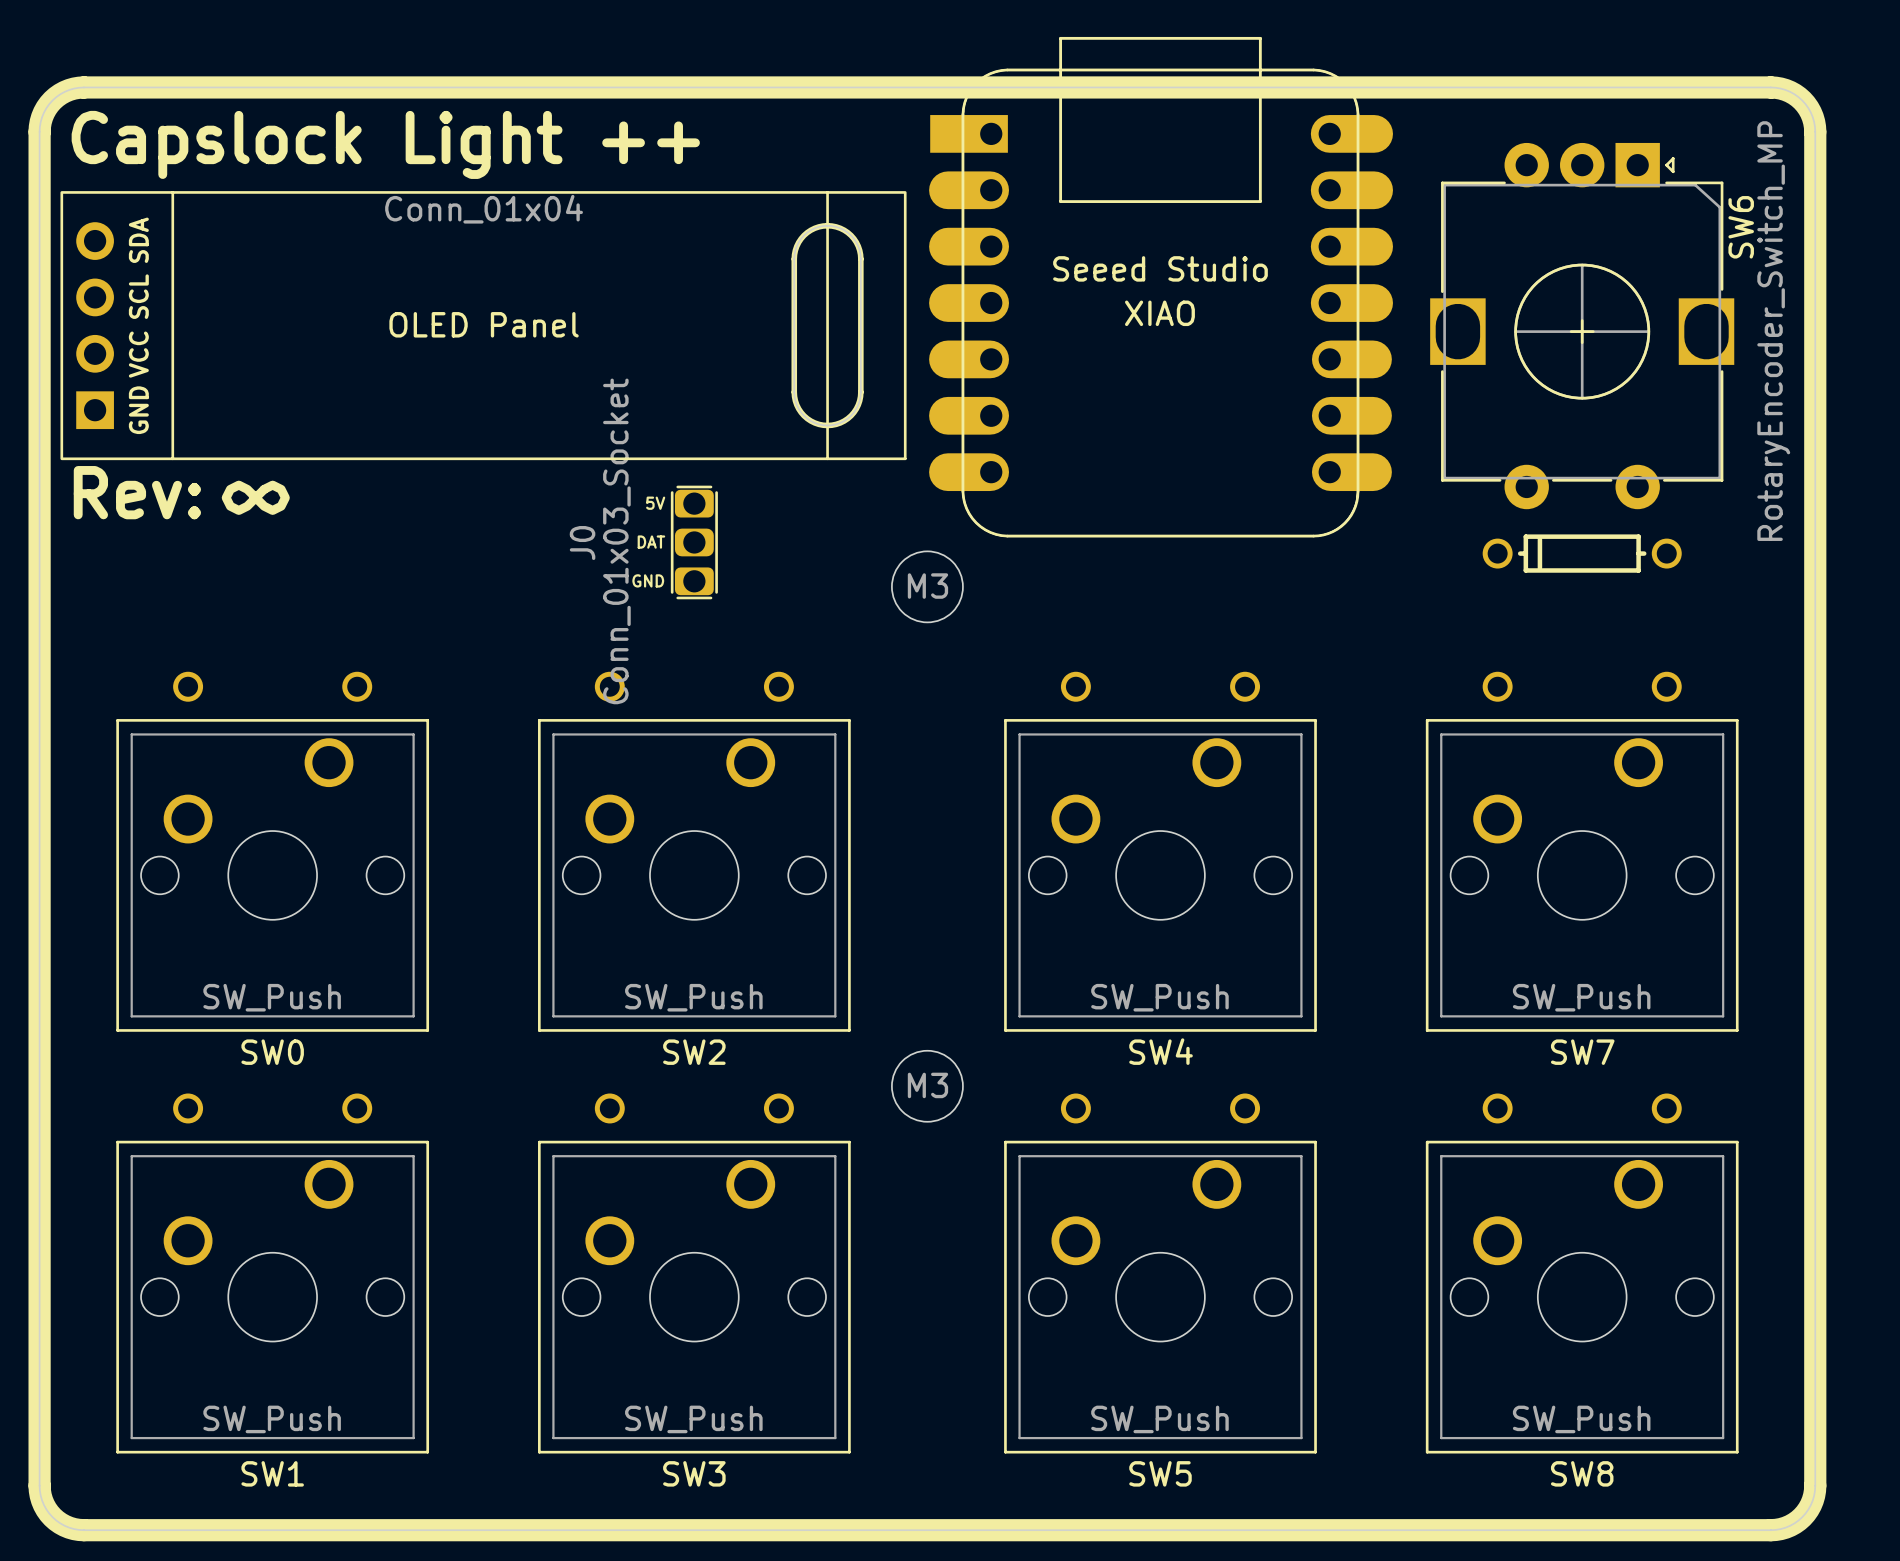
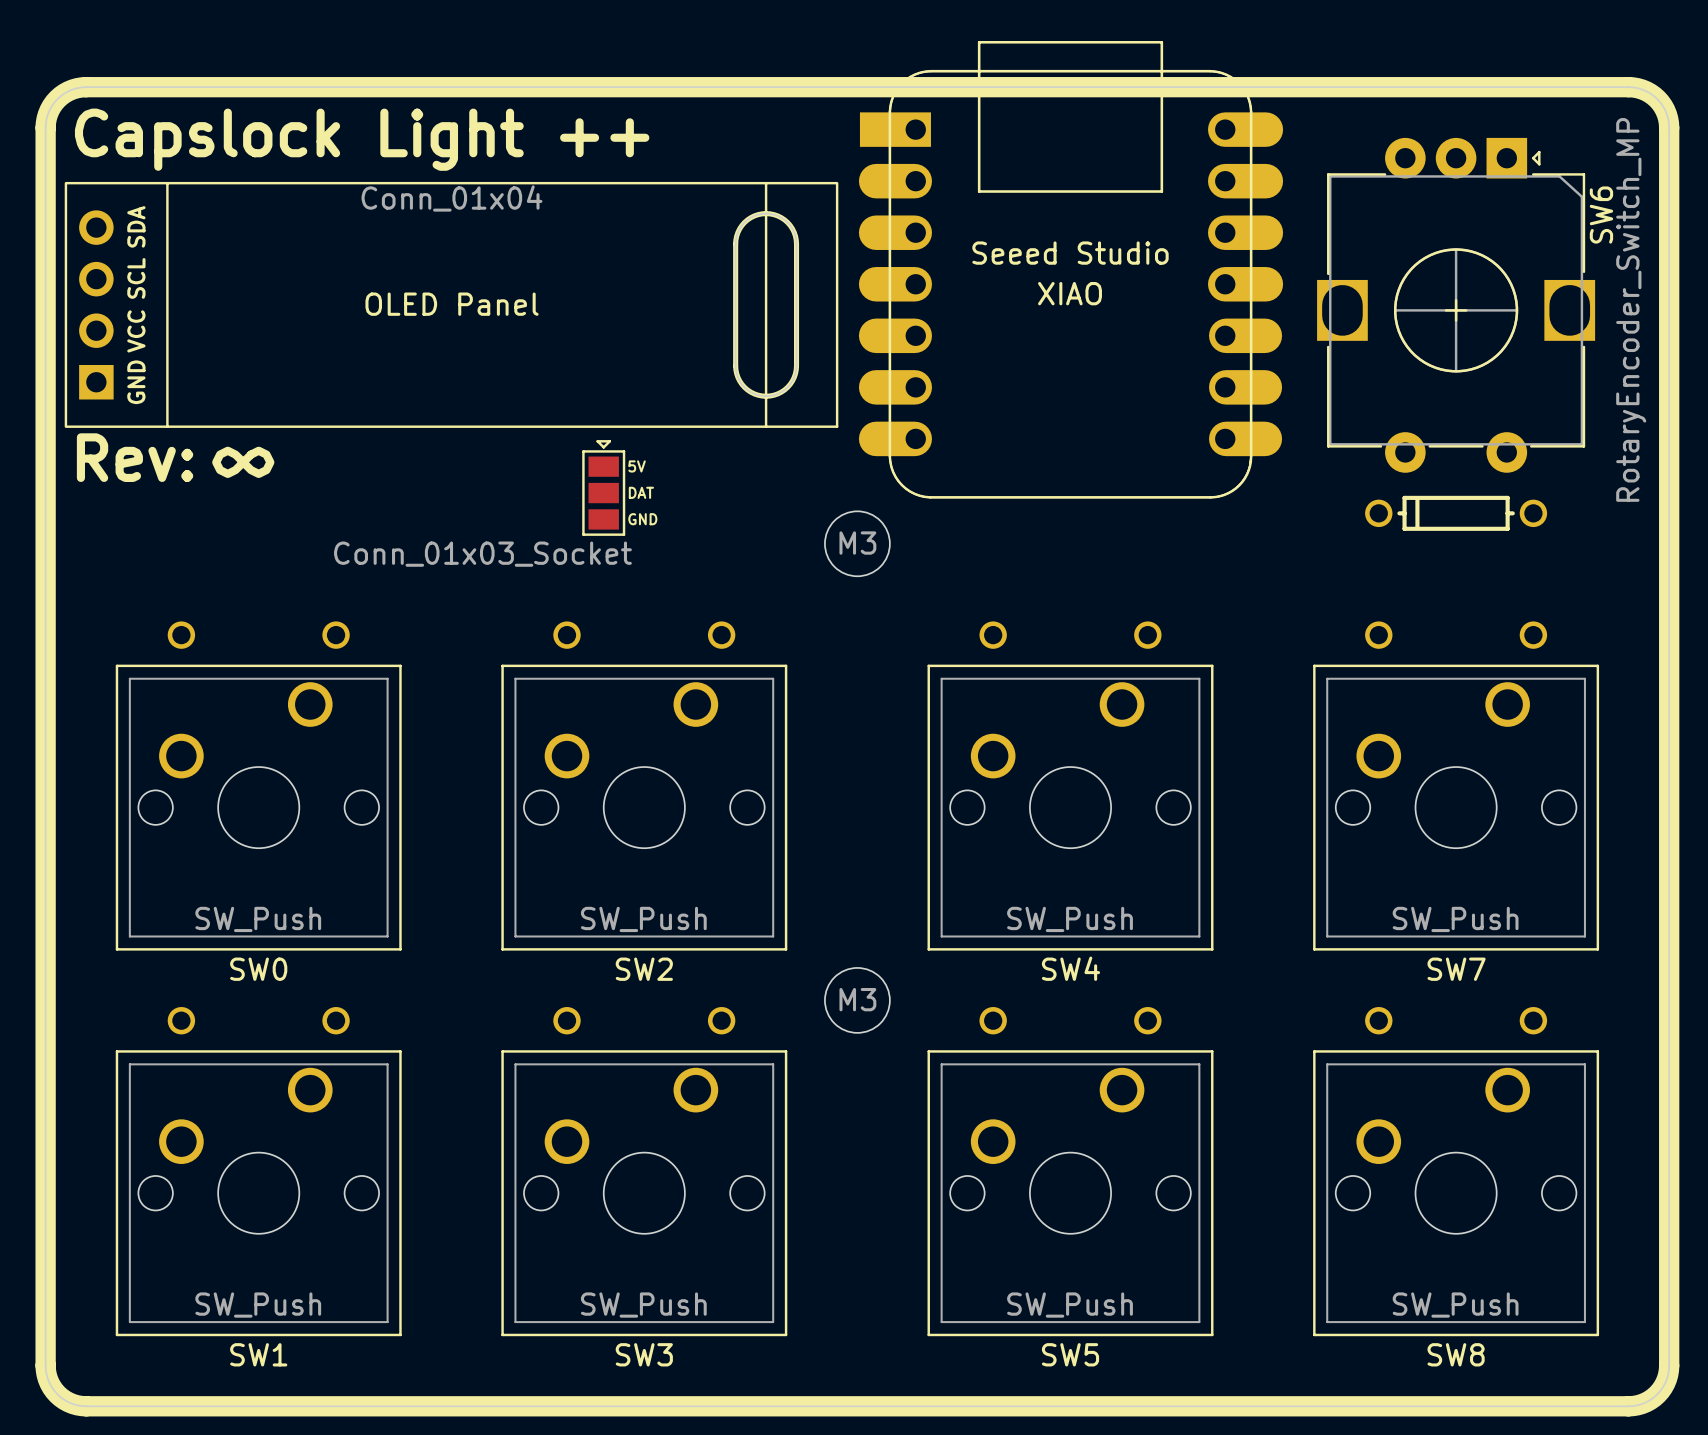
part: none -> Conn_01x03_Socket (603, 487)
J0: Conn_01x03_Socket (694, 542) -> none

